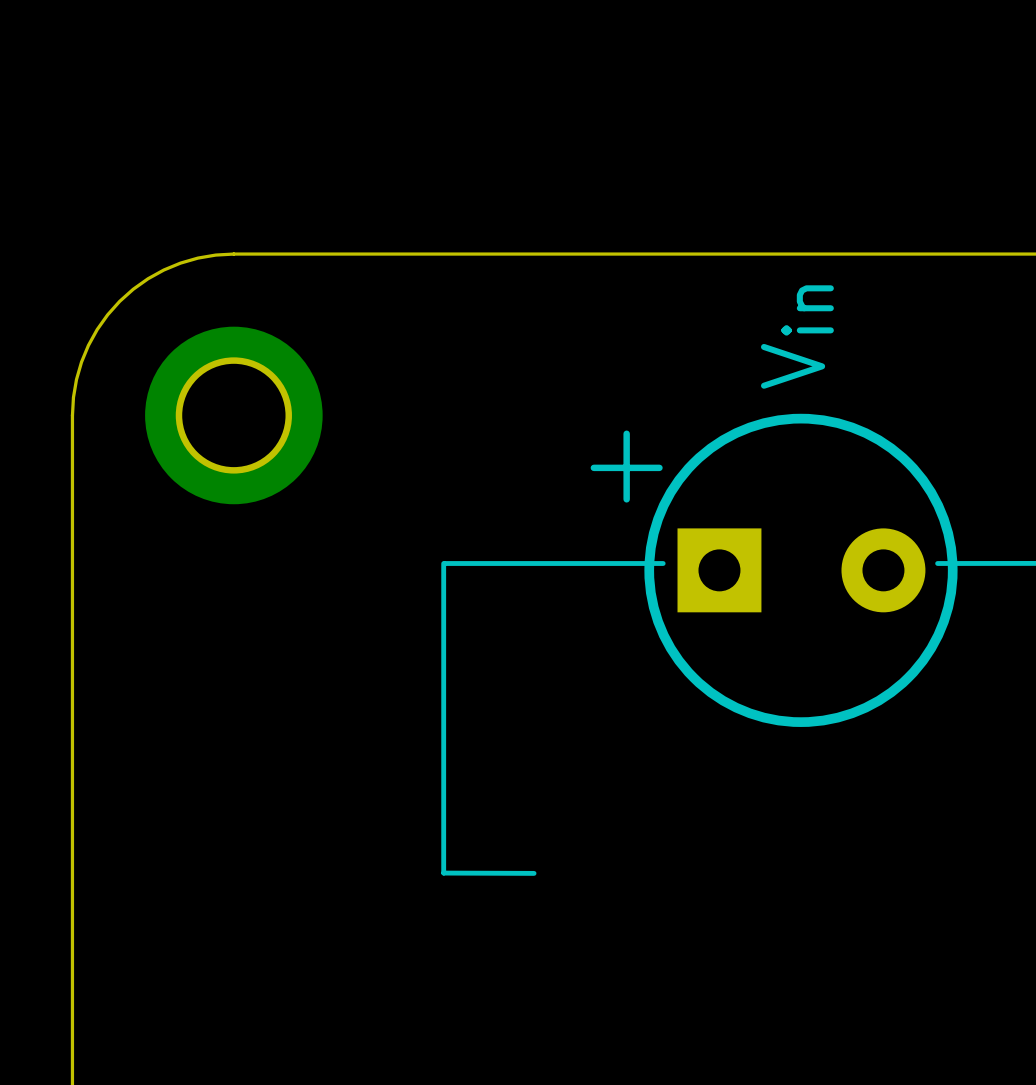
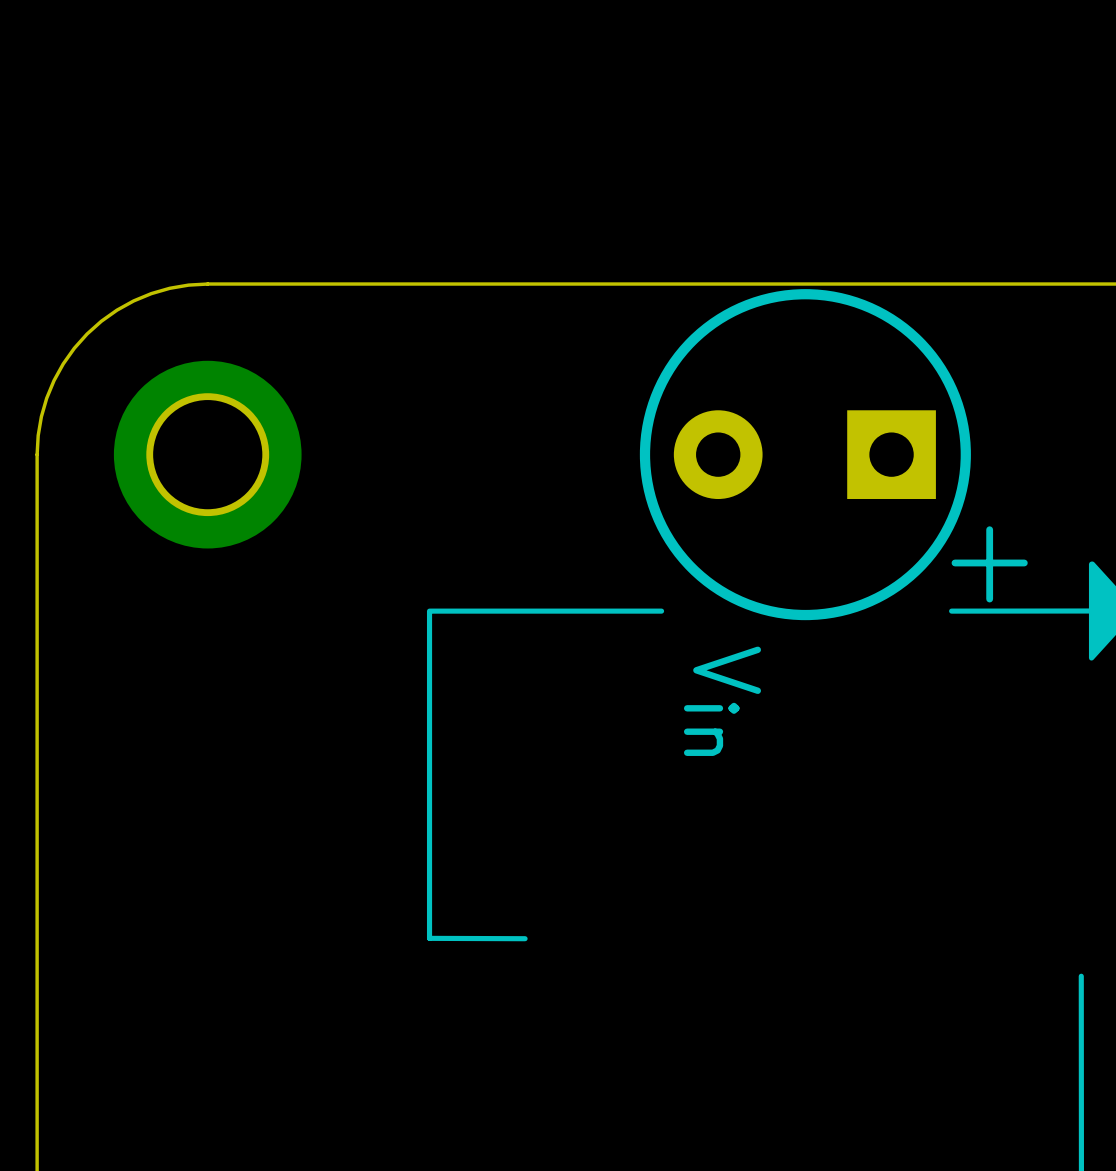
part: none -> (833, 454)
part: (774, 570) -> none

